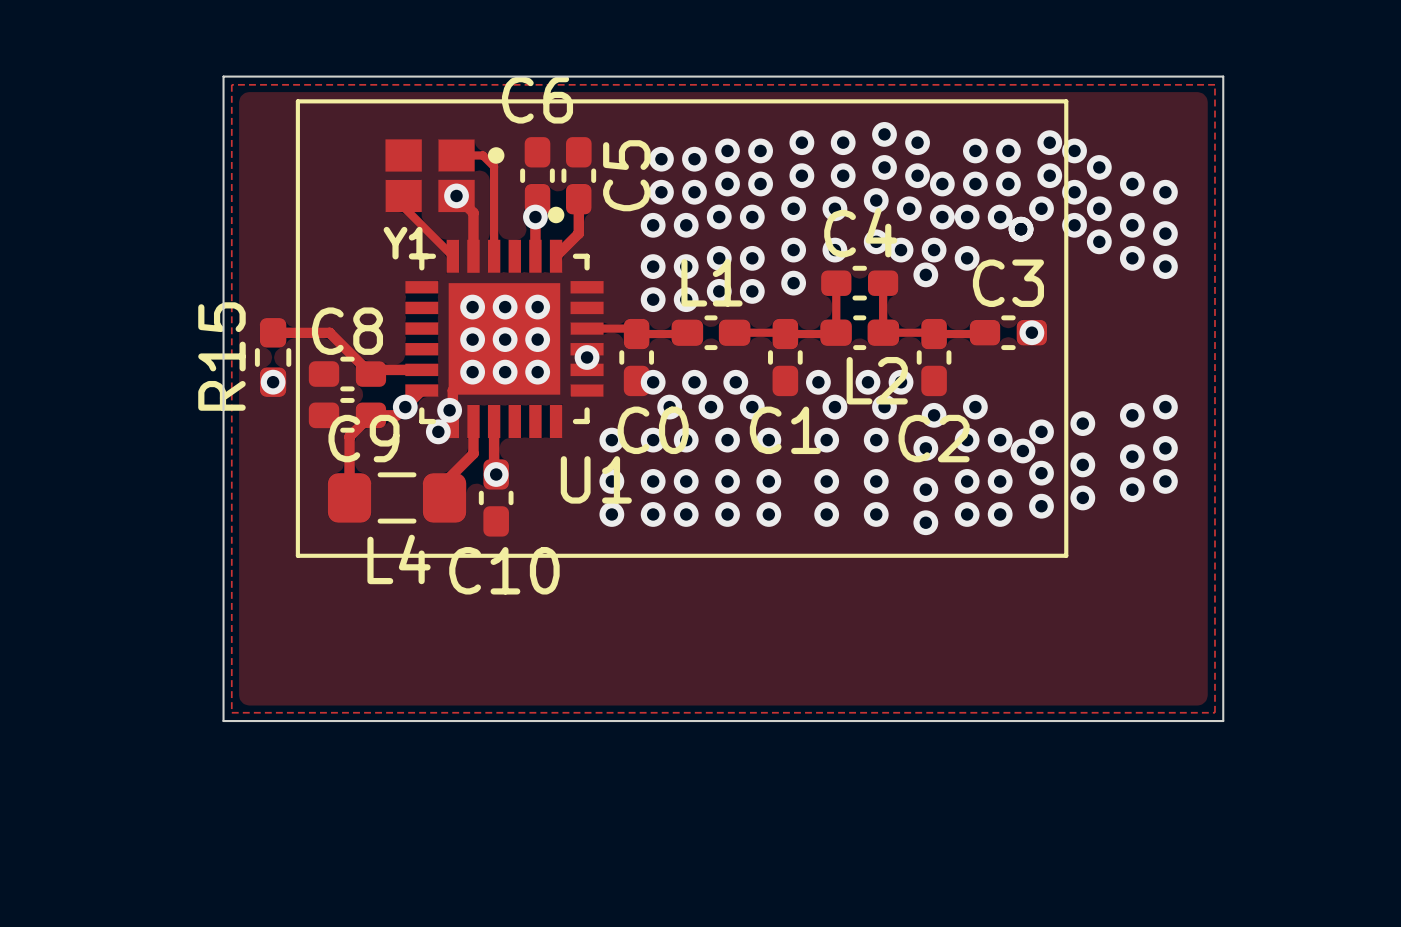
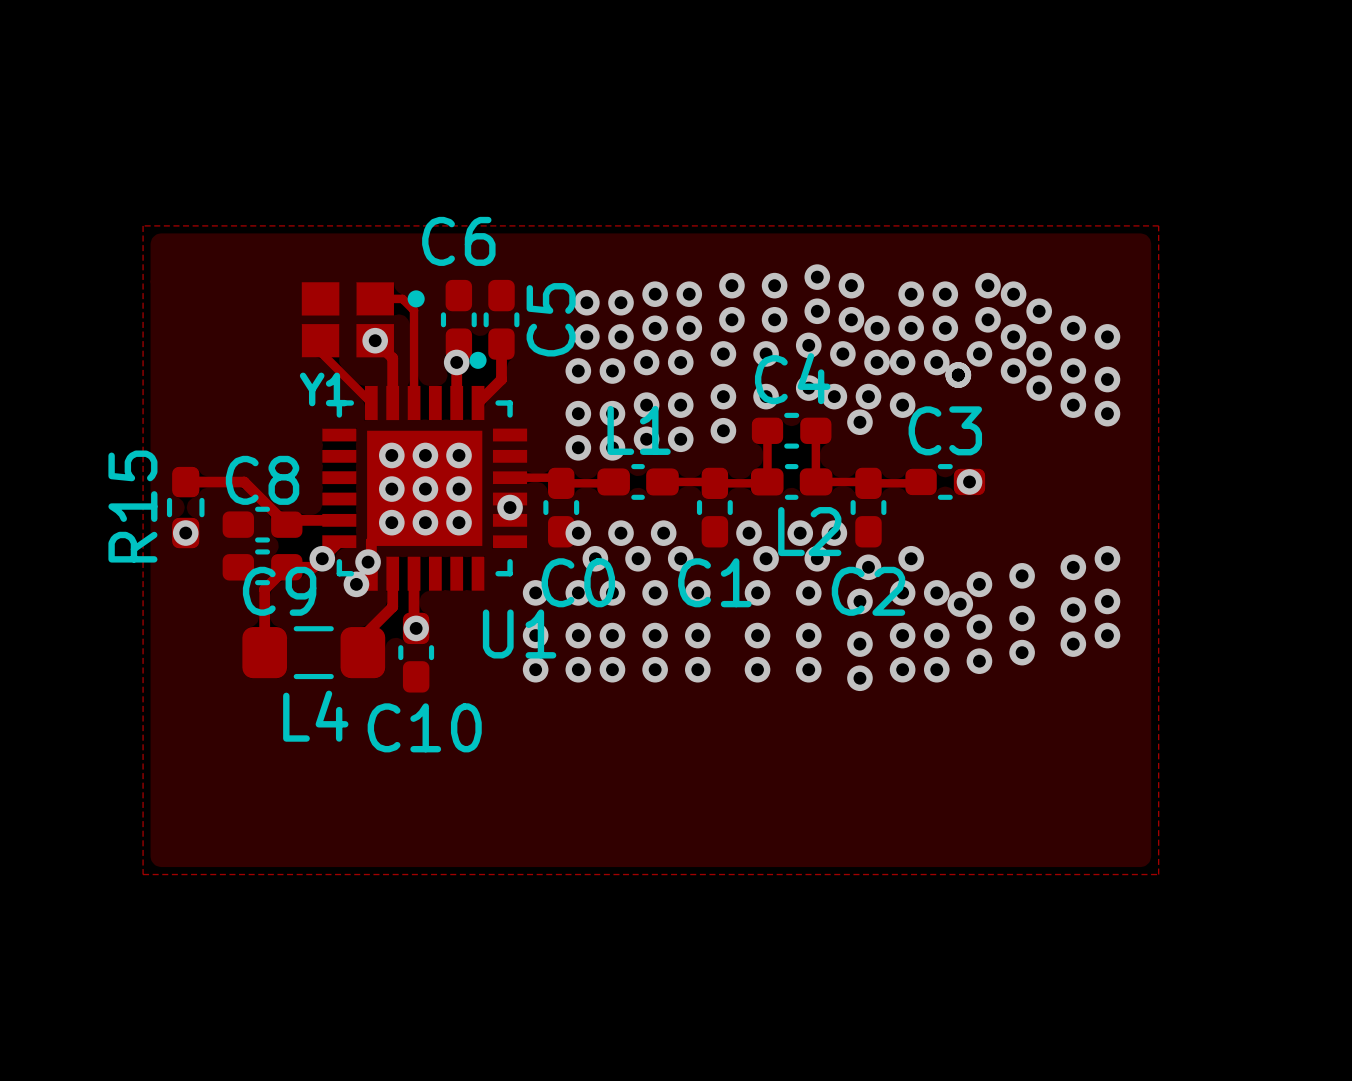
board edge: (223, 76) (1223, 76) (1223, 721) (223, 721) (223, 76) -> none
line: (297, 101) (1066, 101) (1066, 555) (297, 555) (297, 101) -> none

